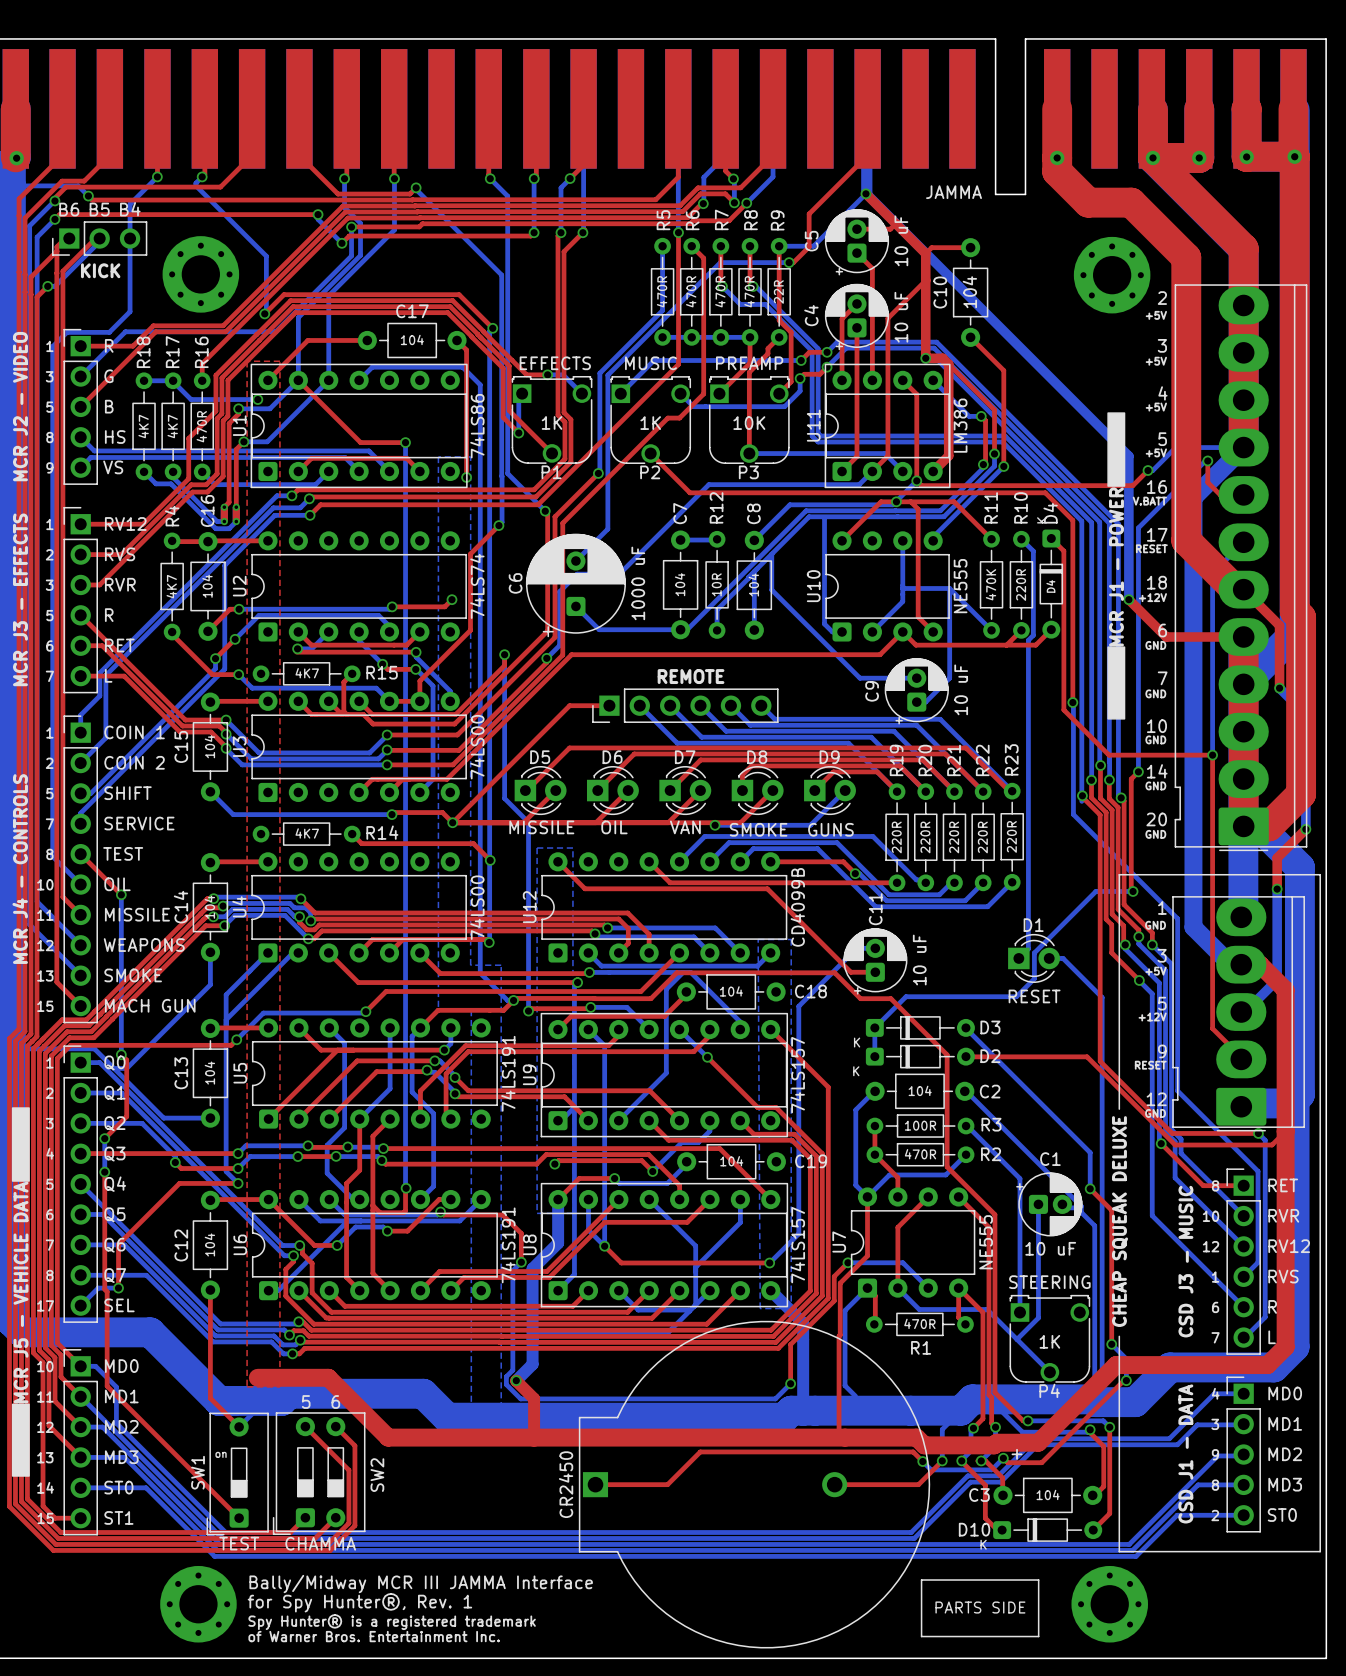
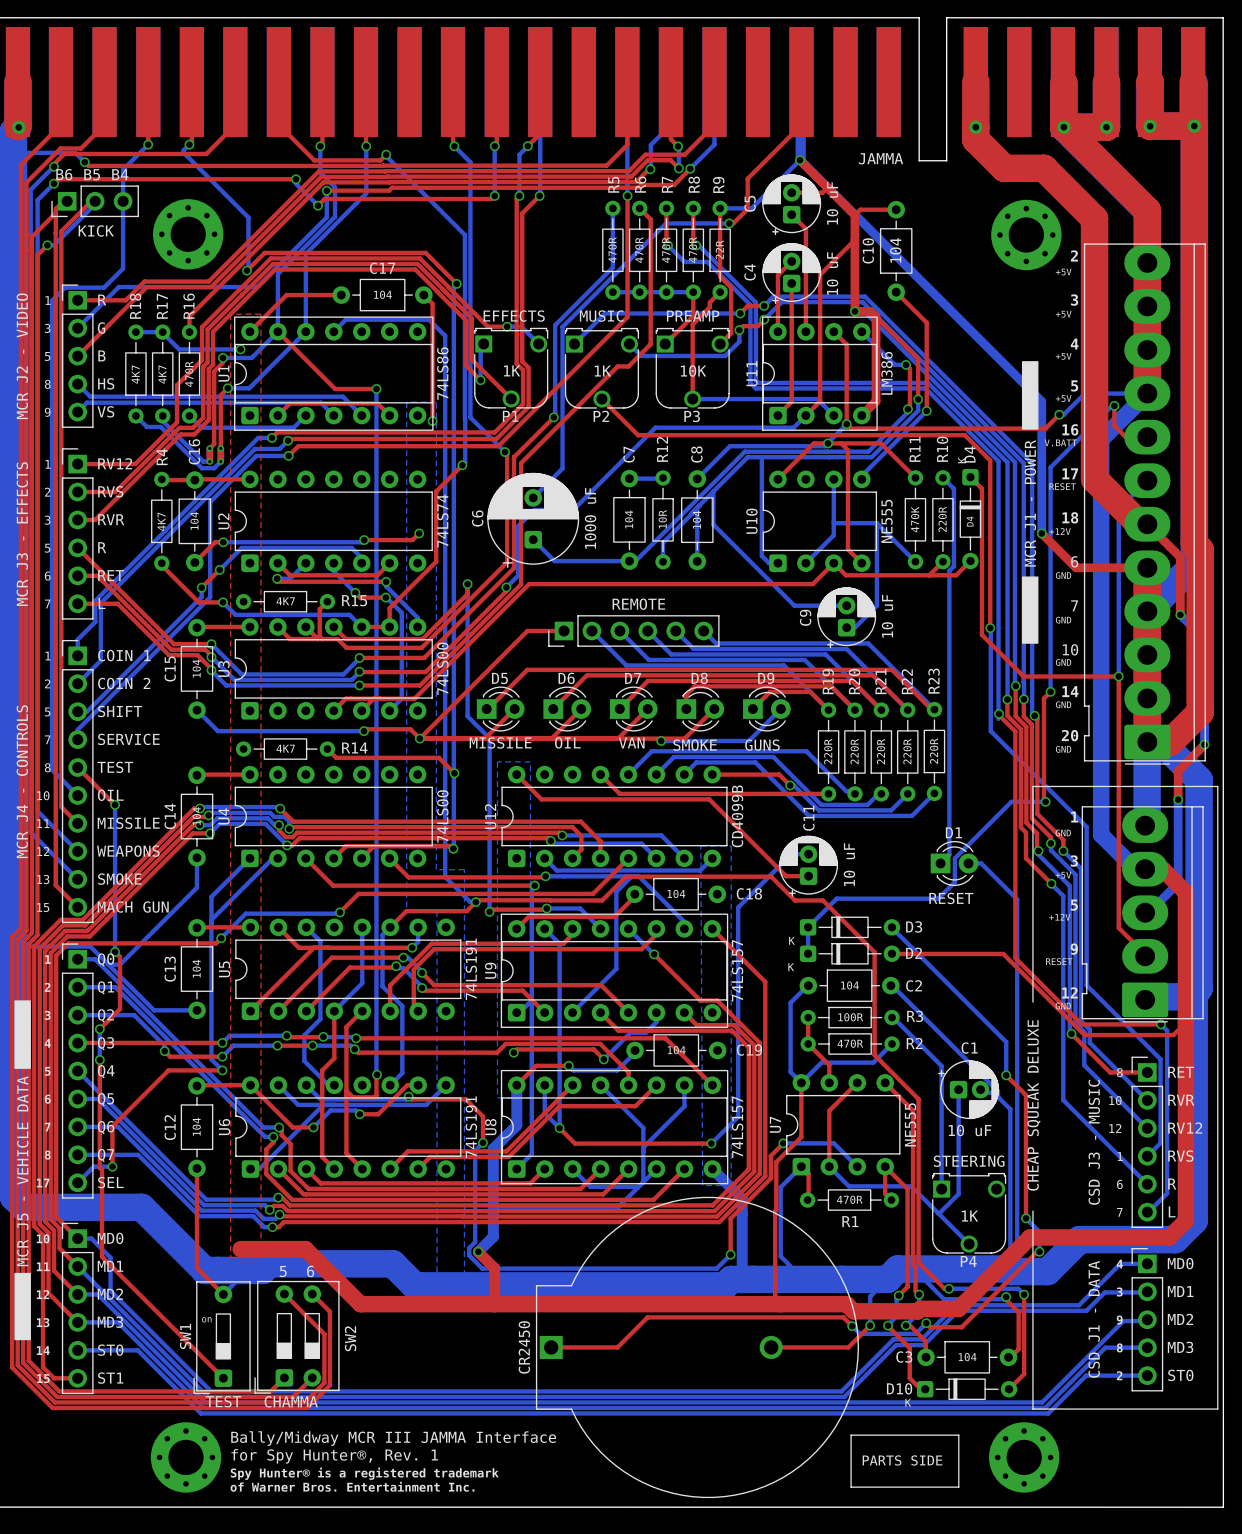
text: + (1017, 1454) -> none

